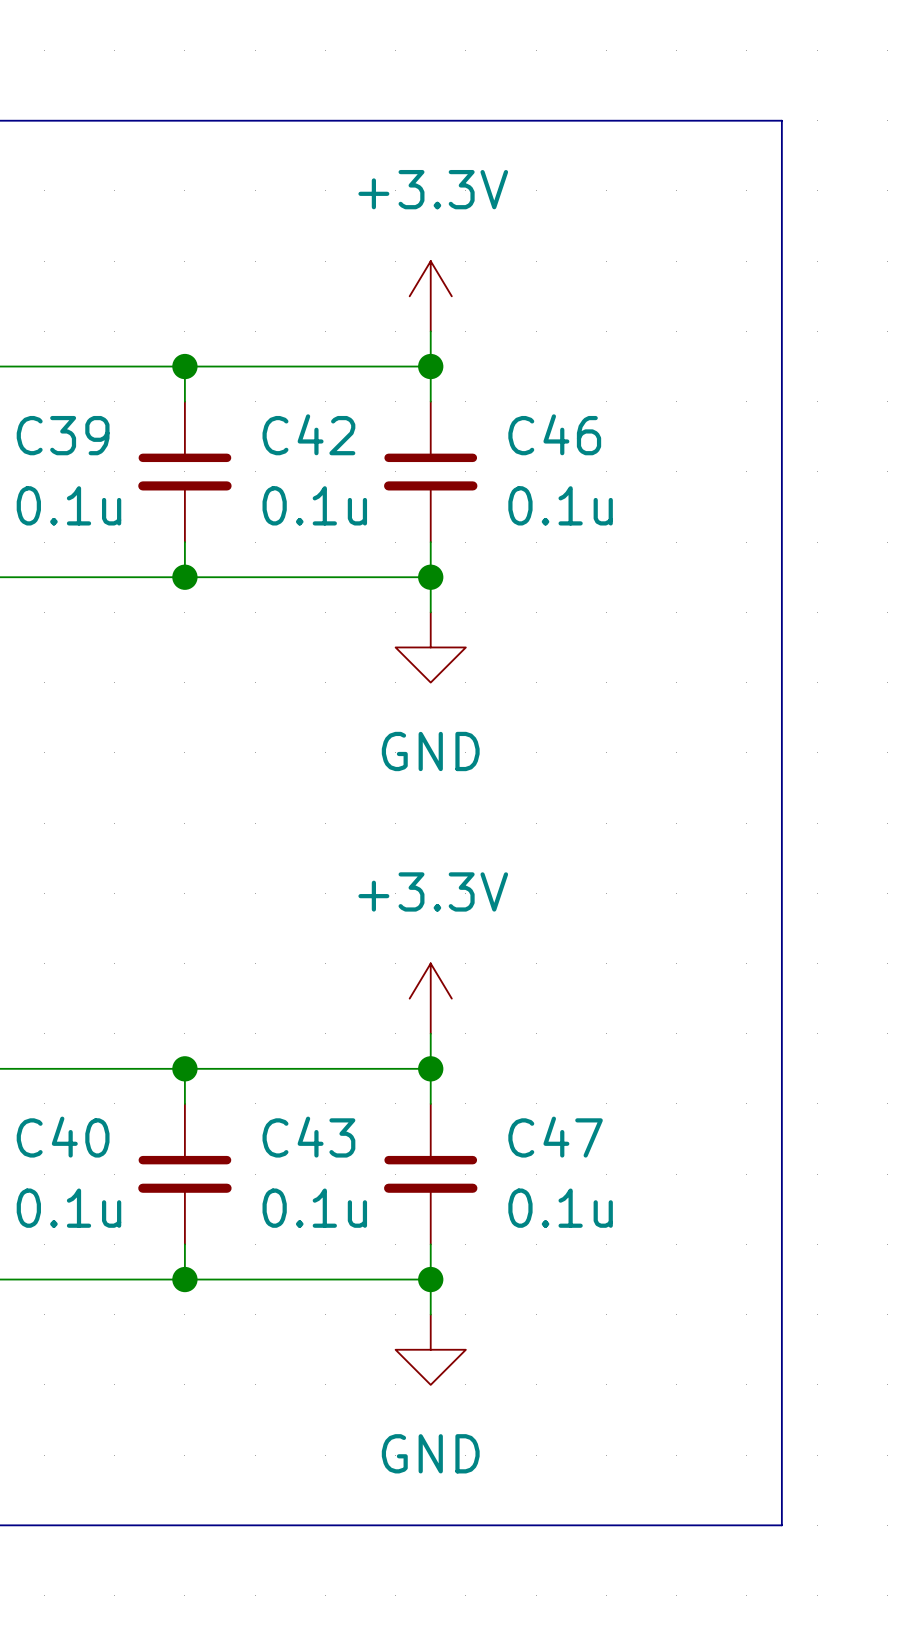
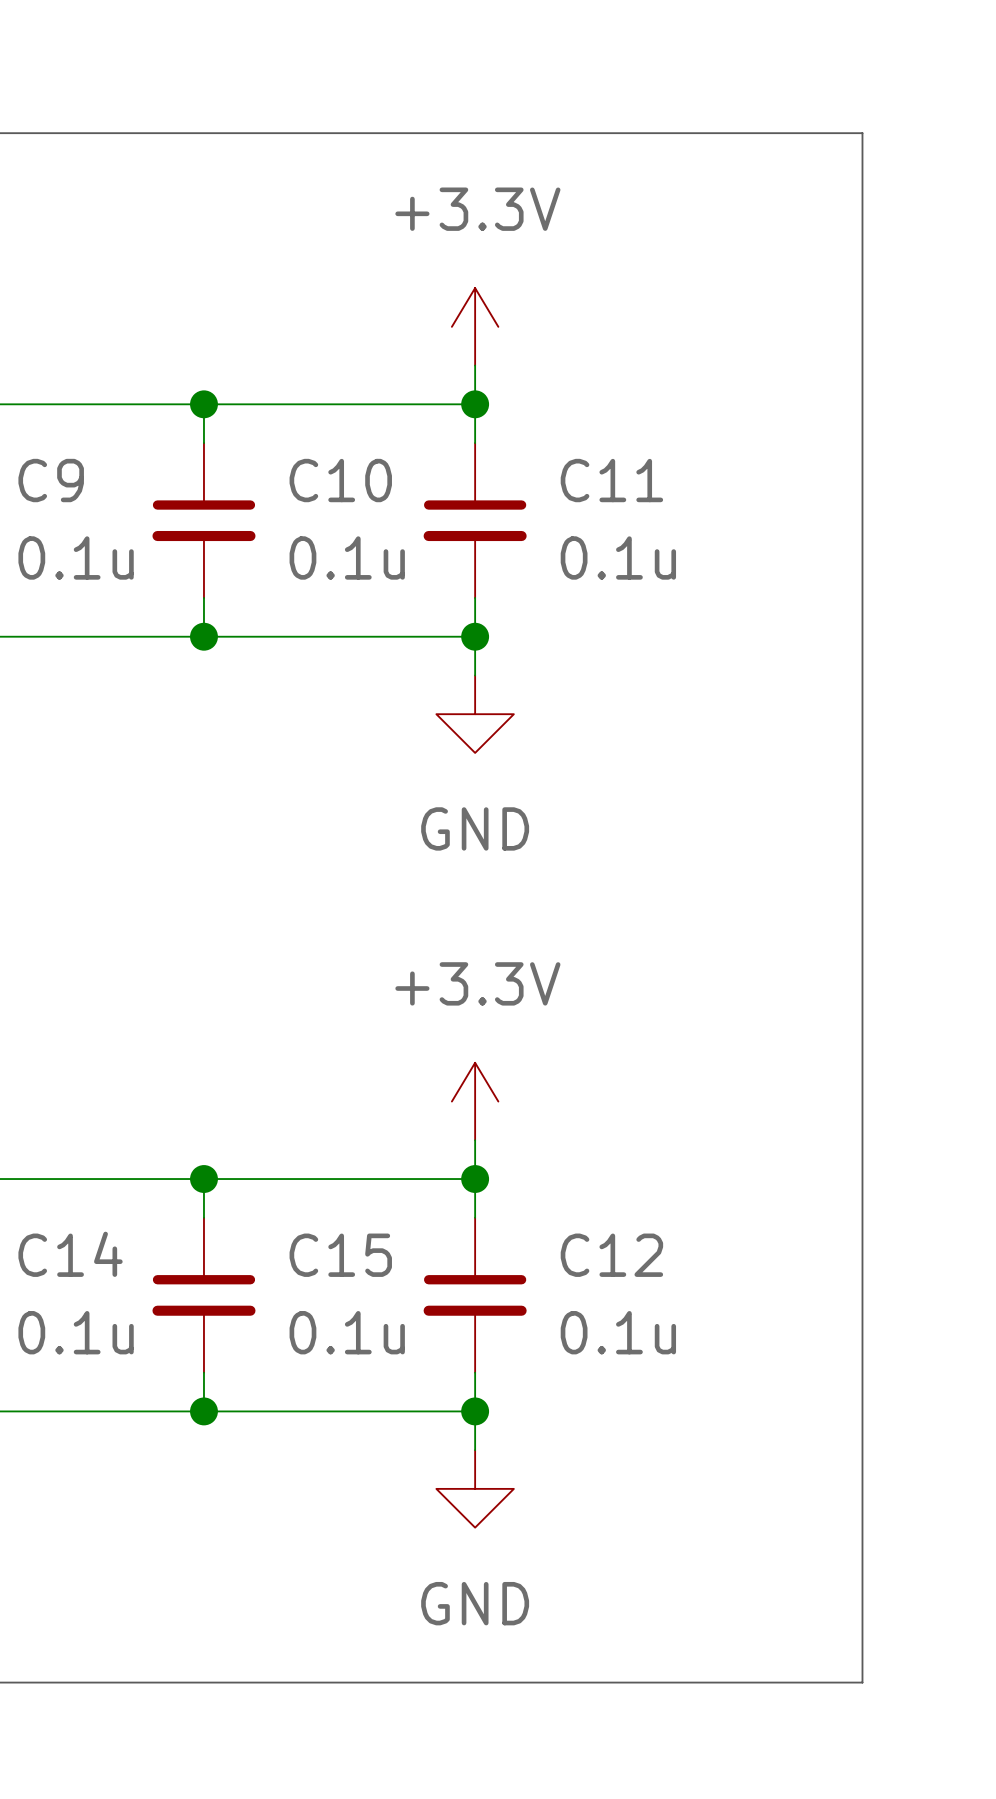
C42 name: C42 (308, 434) -> C10 (340, 480)
C46 name: C46 (554, 434) -> C11 (611, 480)
C39 name: C39 (63, 435) -> C9 (51, 480)
C40 name: C40 (63, 1137) -> C14 (70, 1254)
C43 name: C43 (308, 1137) -> C15 (340, 1255)
C47 name: C47 (555, 1137) -> C12 (611, 1255)

